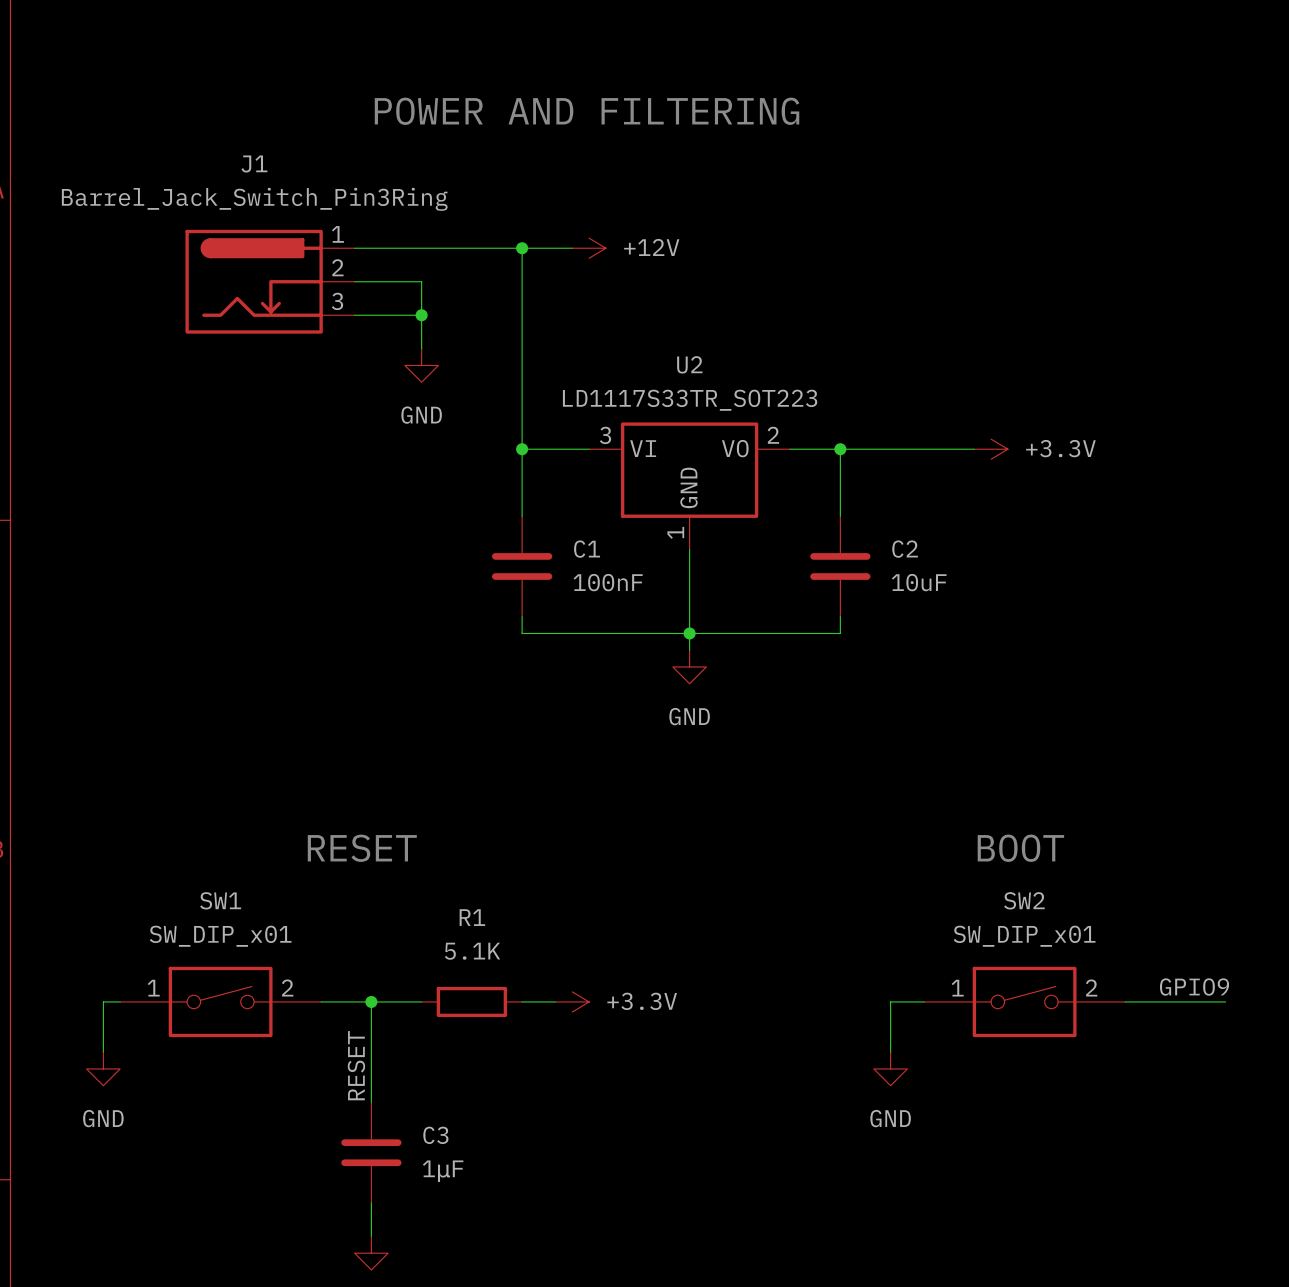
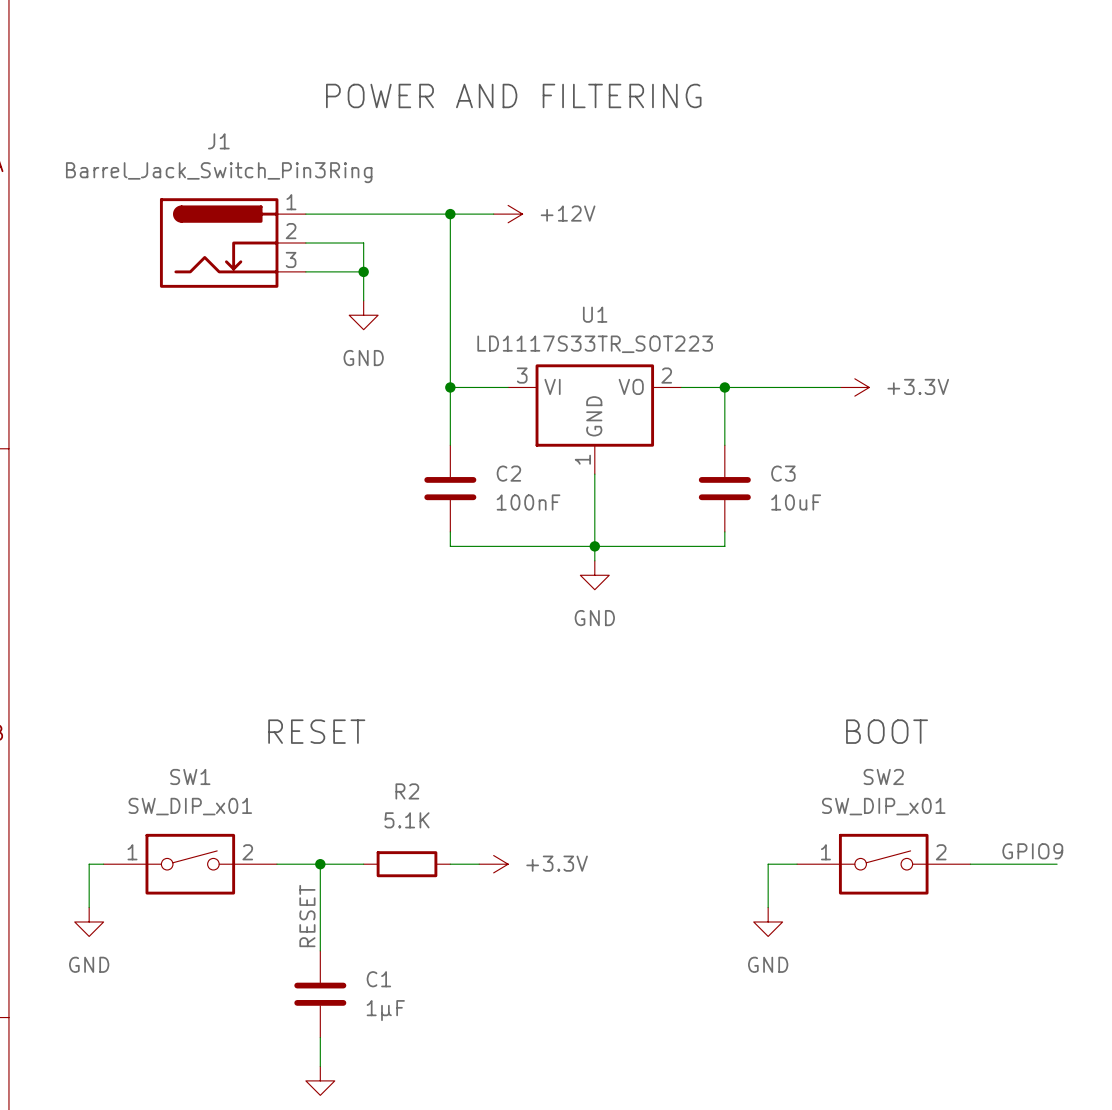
U2 name: U2 (689, 364) -> U1 (595, 314)
C1 name: C1 (587, 549) -> C2 (508, 473)
C2 name: C2 (905, 549) -> C3 (783, 473)
R1 name: R1 (472, 917) -> R2 (407, 791)
C3 name: C3 (435, 1135) -> C1 (378, 979)

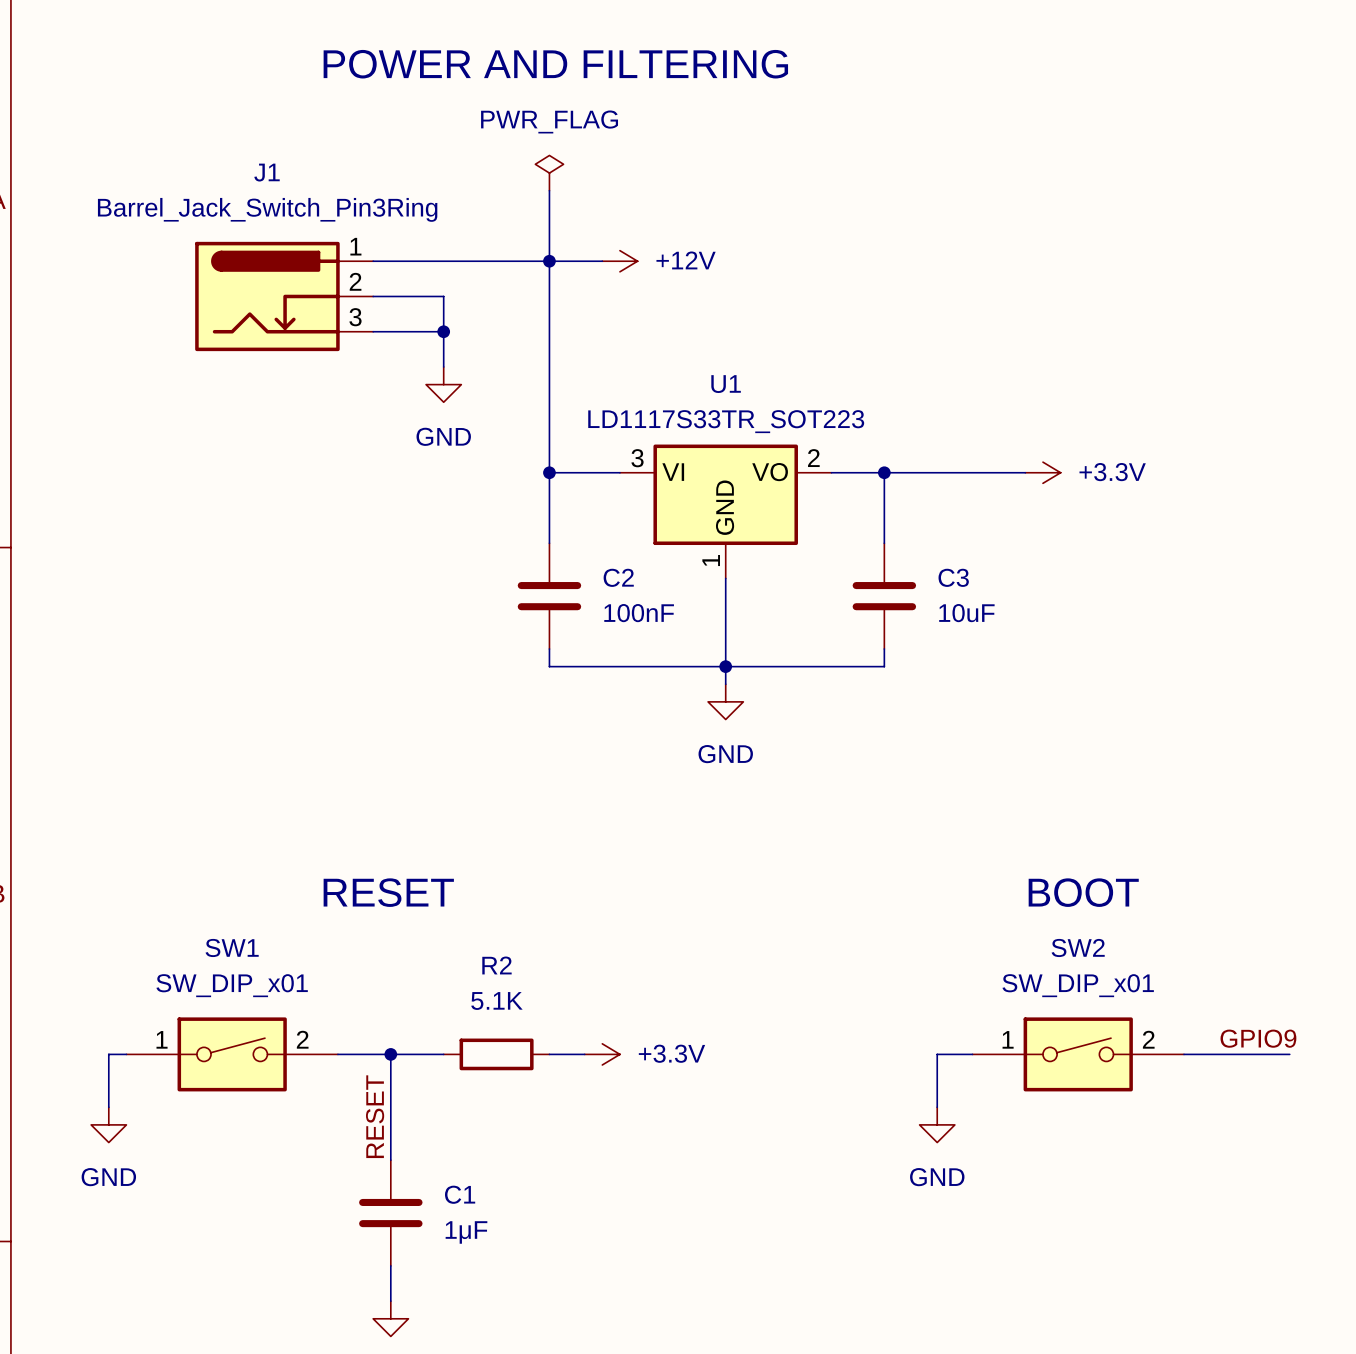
text position: POWER AND FILTERING (513, 95) -> POWER AND FILTERING (555, 64)
power symbol: none -> PWR_FLAG (549, 173)
wire: none -> (549, 190) (549, 261)

